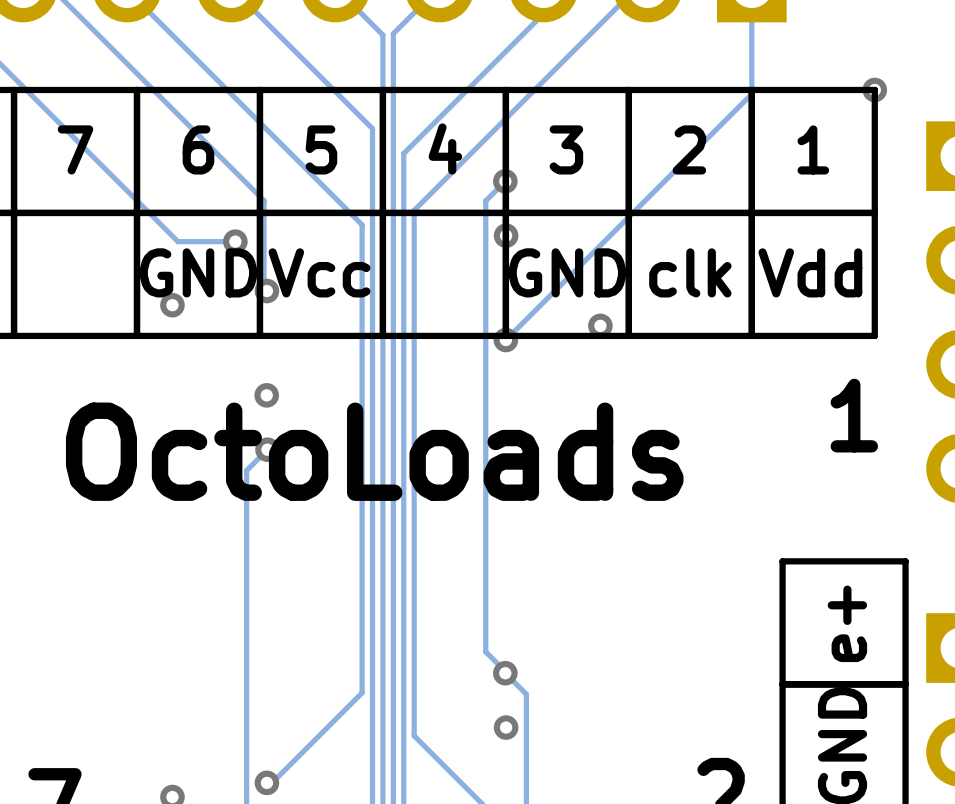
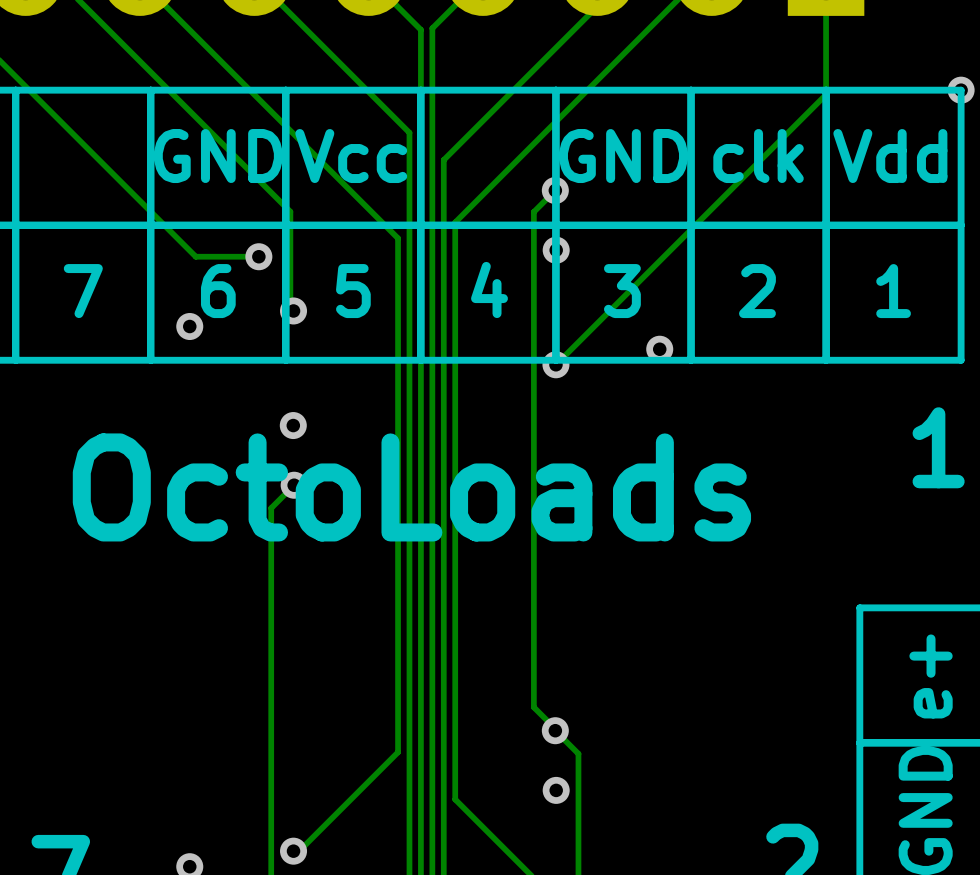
text position: 4 (445, 148) -> 4 (489, 289)
text position: 7 (75, 149) -> 7 (83, 291)
text: 6 (198, 149) -> GND (218, 156)
text: 5 (321, 149) -> Vcc (351, 156)
text: 3 (566, 149) -> GND (623, 156)
text: 2 (689, 149) -> clk (758, 156)
text: 1 (813, 149) -> Vdd (890, 156)
text: GND (198, 272) -> 6 (218, 291)
text: Vcc (319, 272) -> 5 (353, 291)
text: GND (567, 272) -> 3 (622, 291)
text: clk (690, 272) -> 2 (757, 291)
text: Vdd (810, 272) -> 1 (893, 291)

